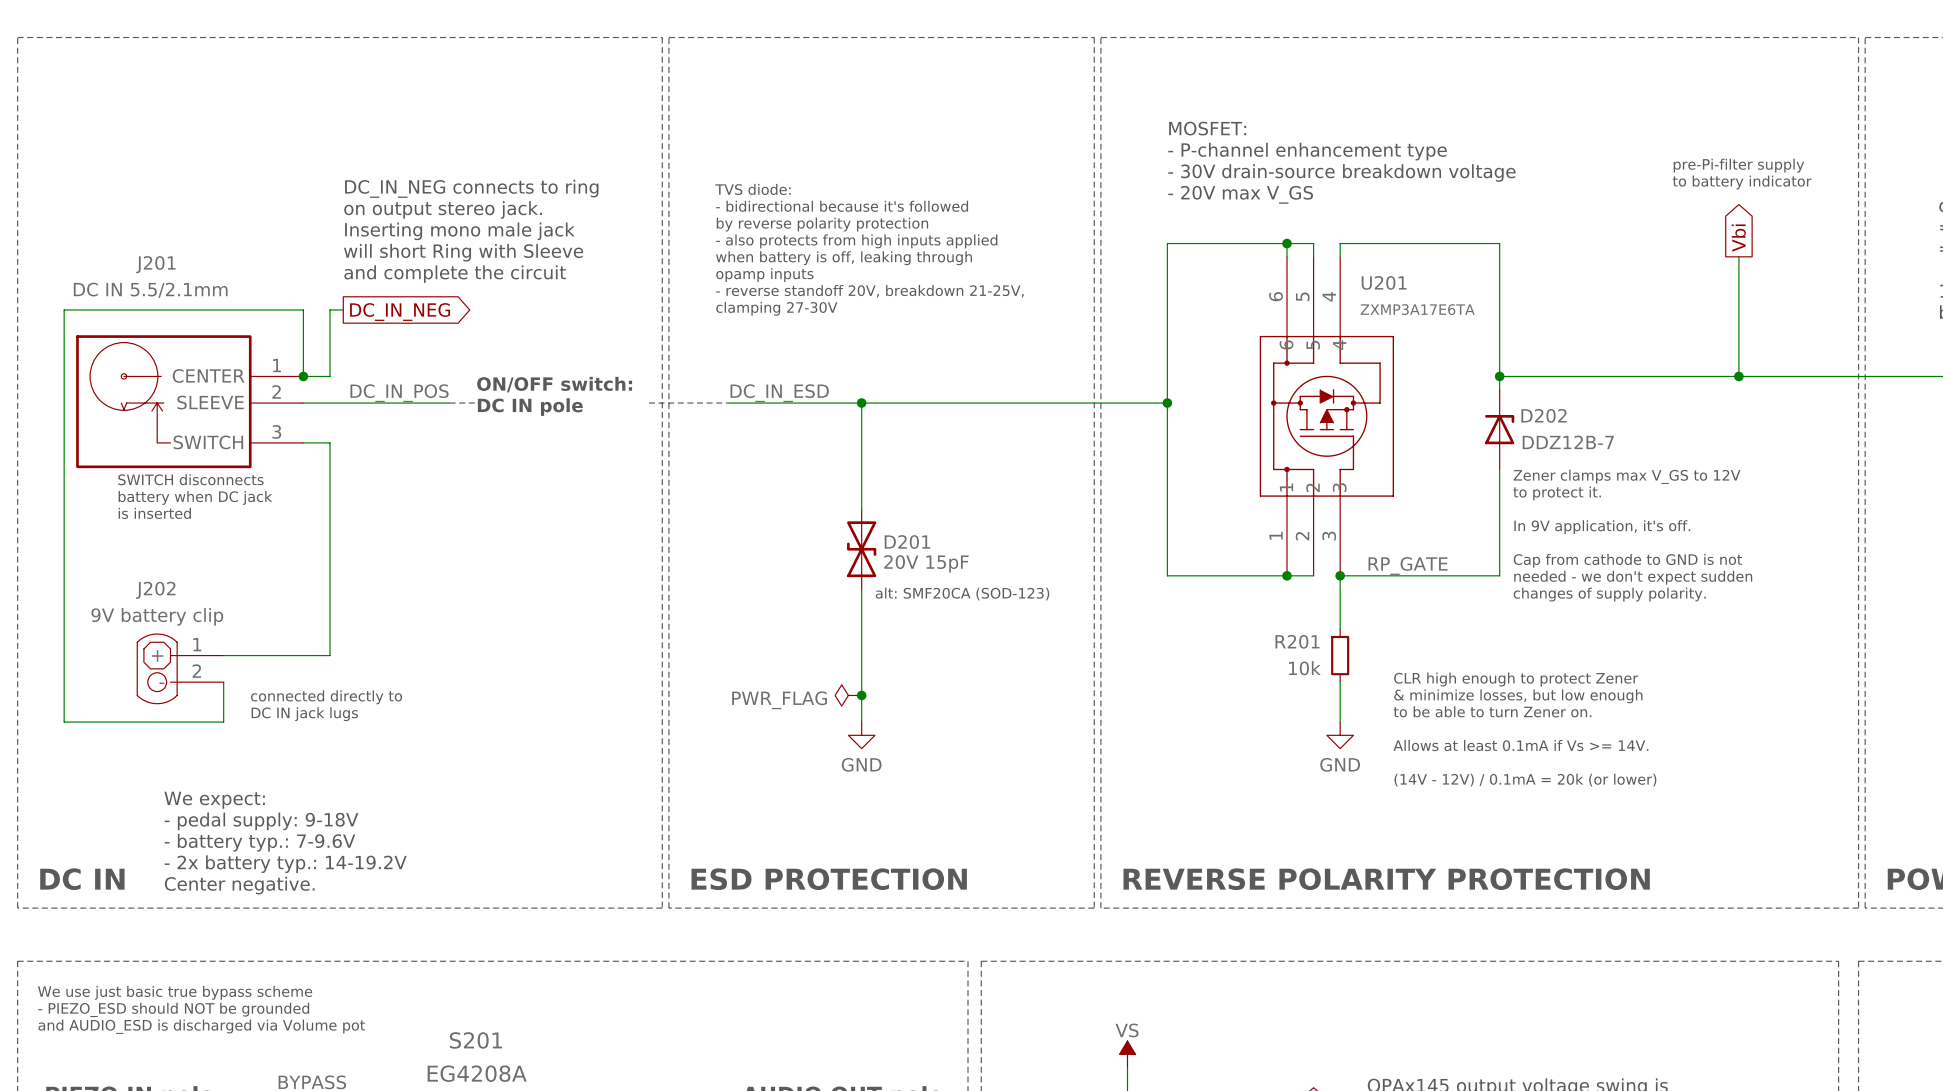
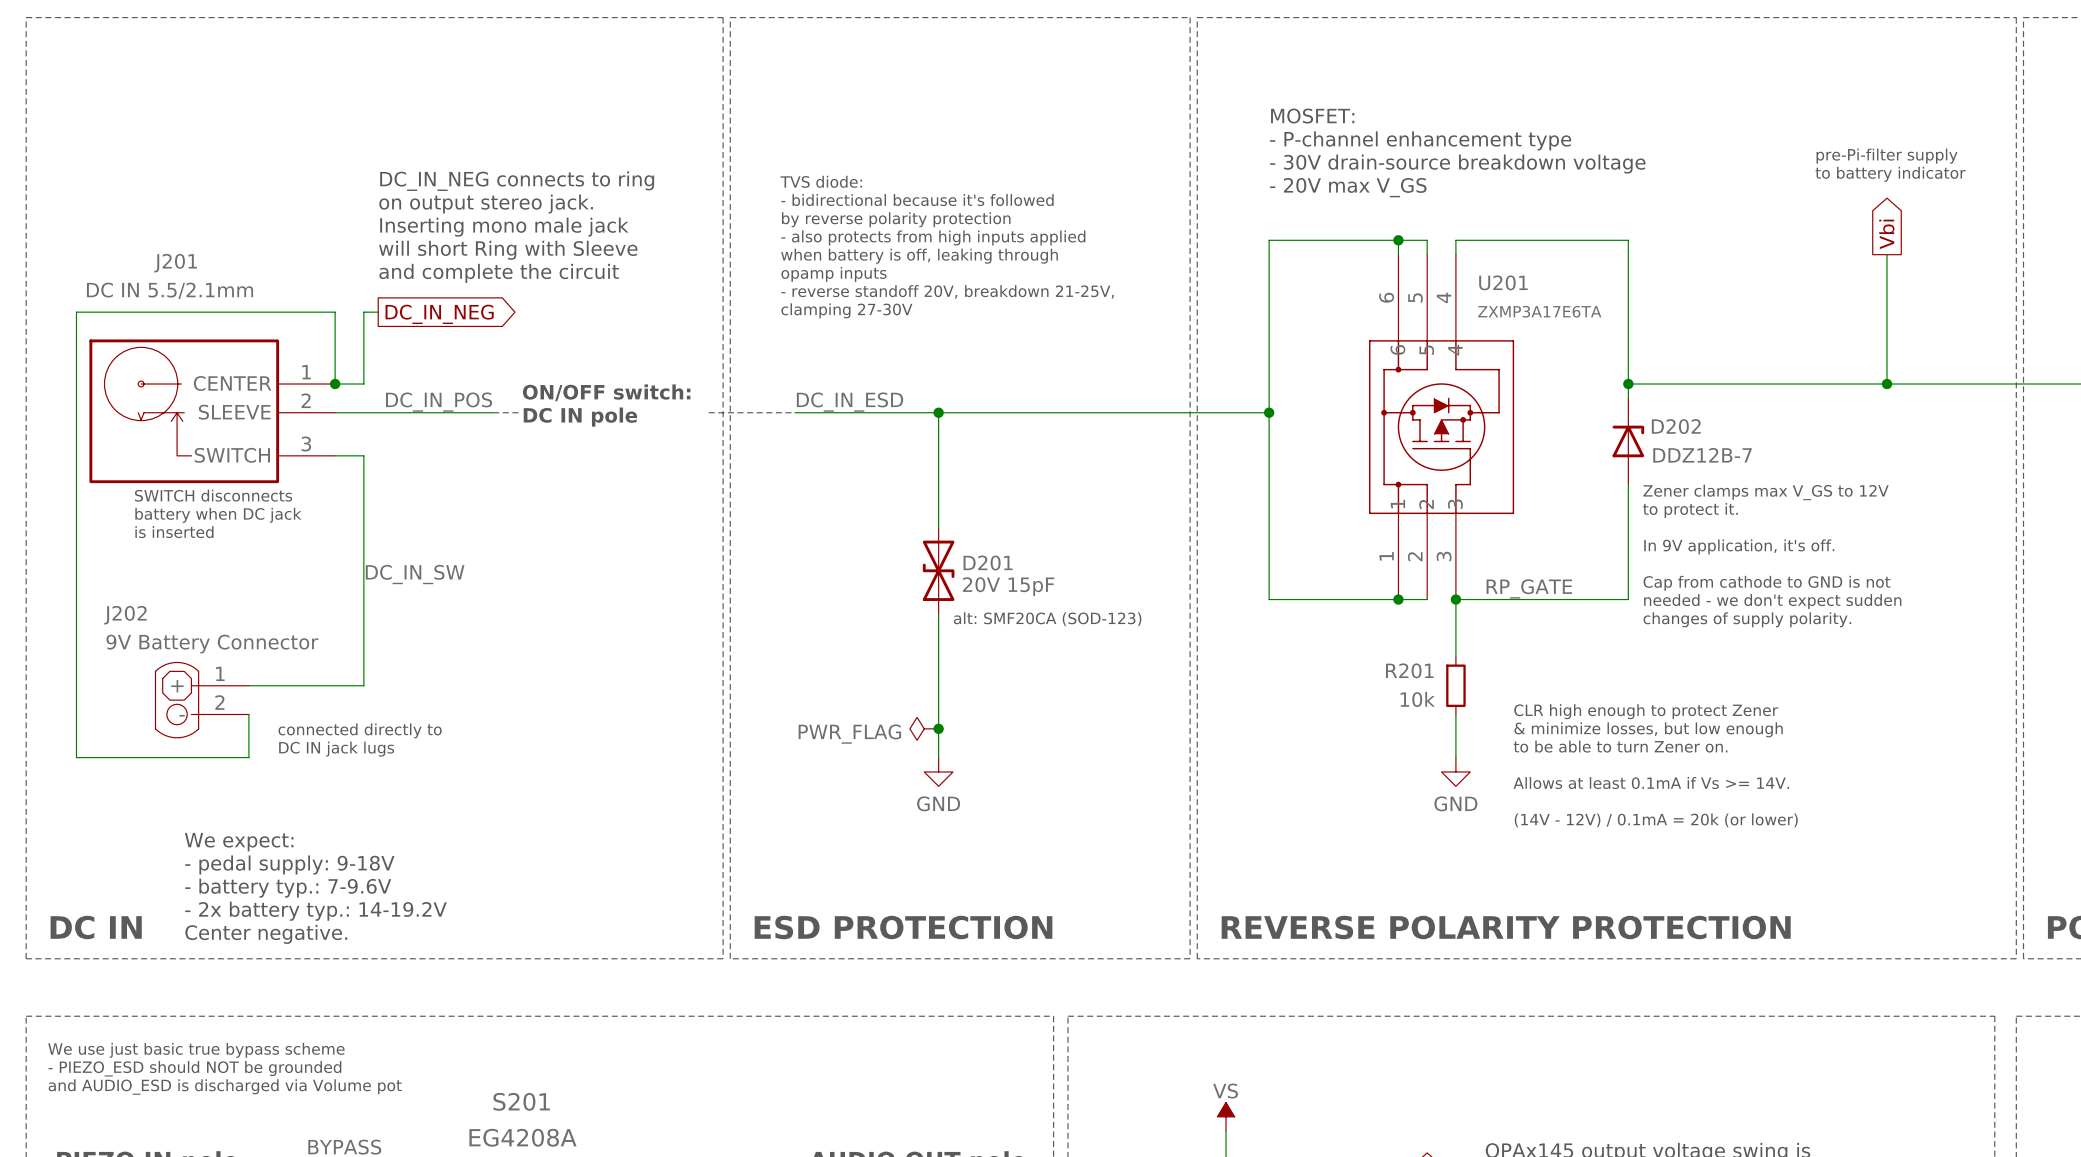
label: none -> DC_IN_SW (415, 574)
J202 name position: J202 (155, 590) -> J202 (125, 615)
J202 value: 9V battery clip (157, 616) -> 9V Battery Connector (212, 644)

